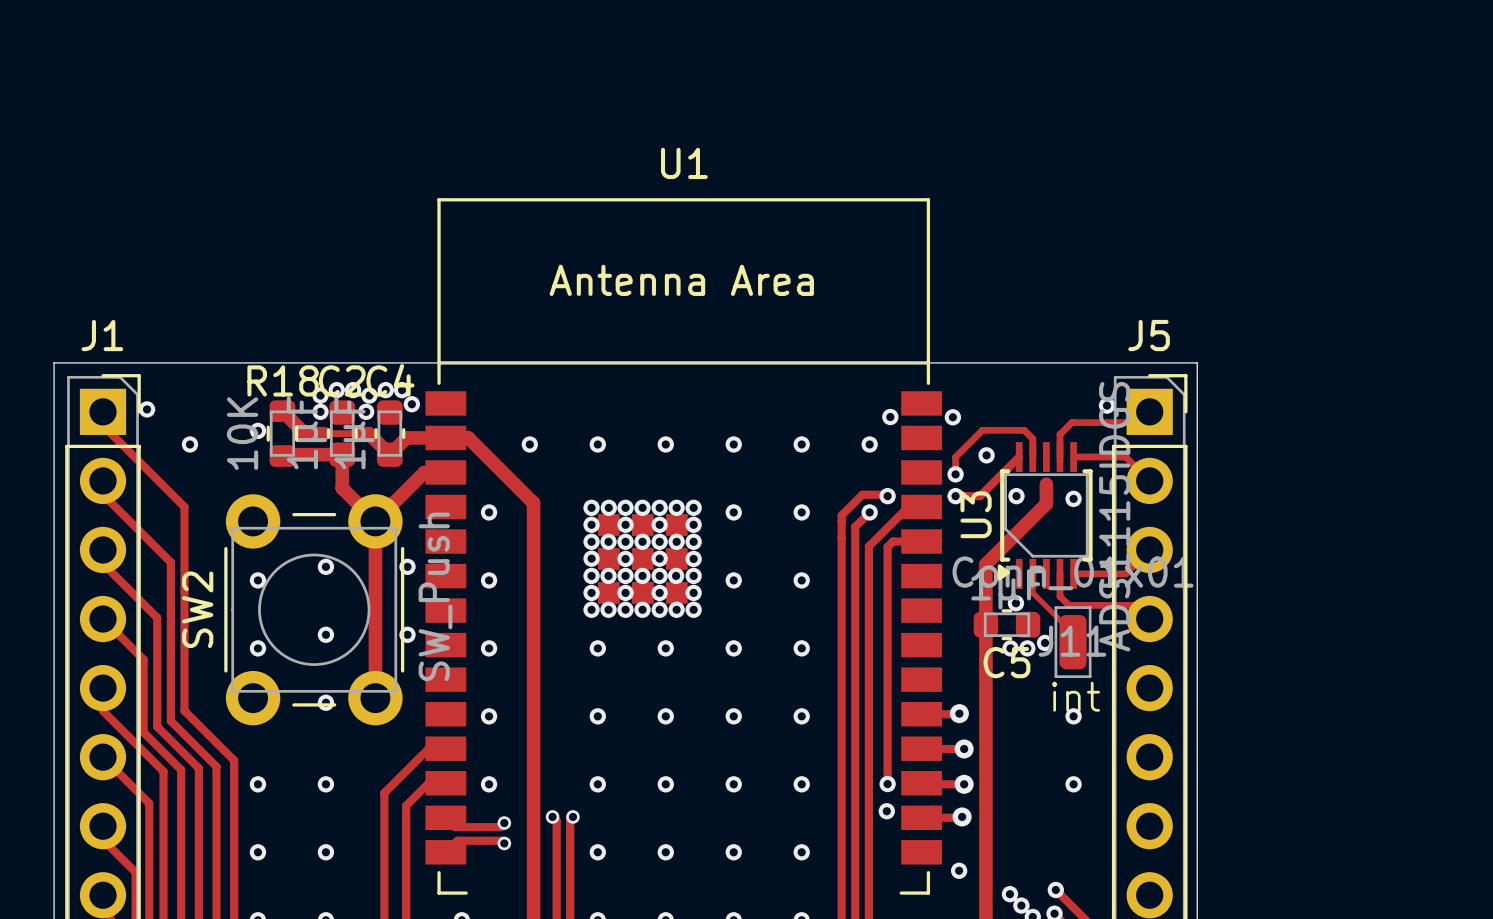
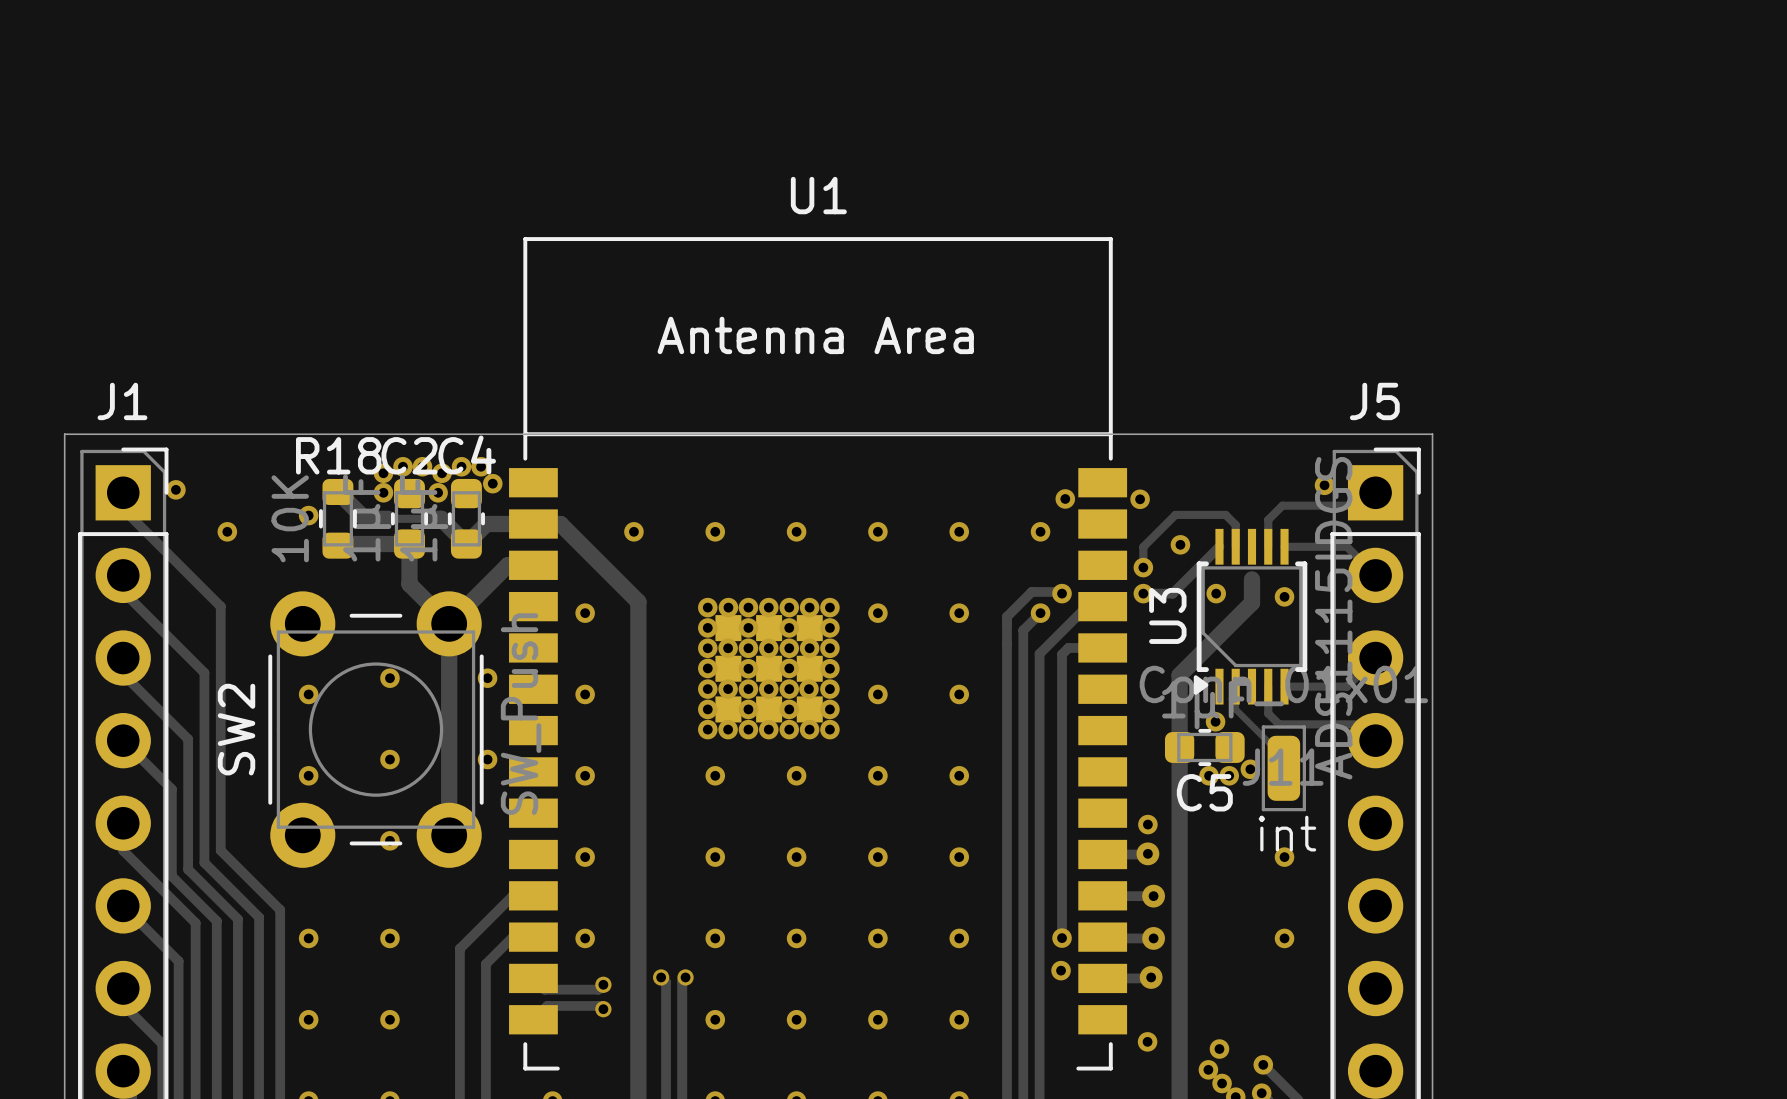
via: none -> (1147, 824)
via: none -> (1219, 1049)

